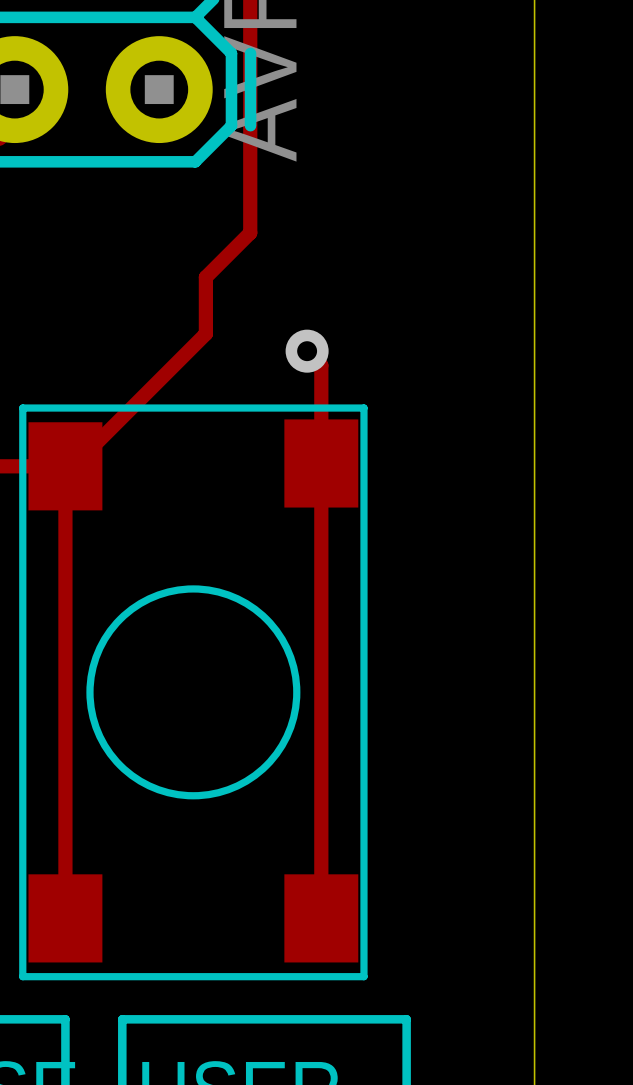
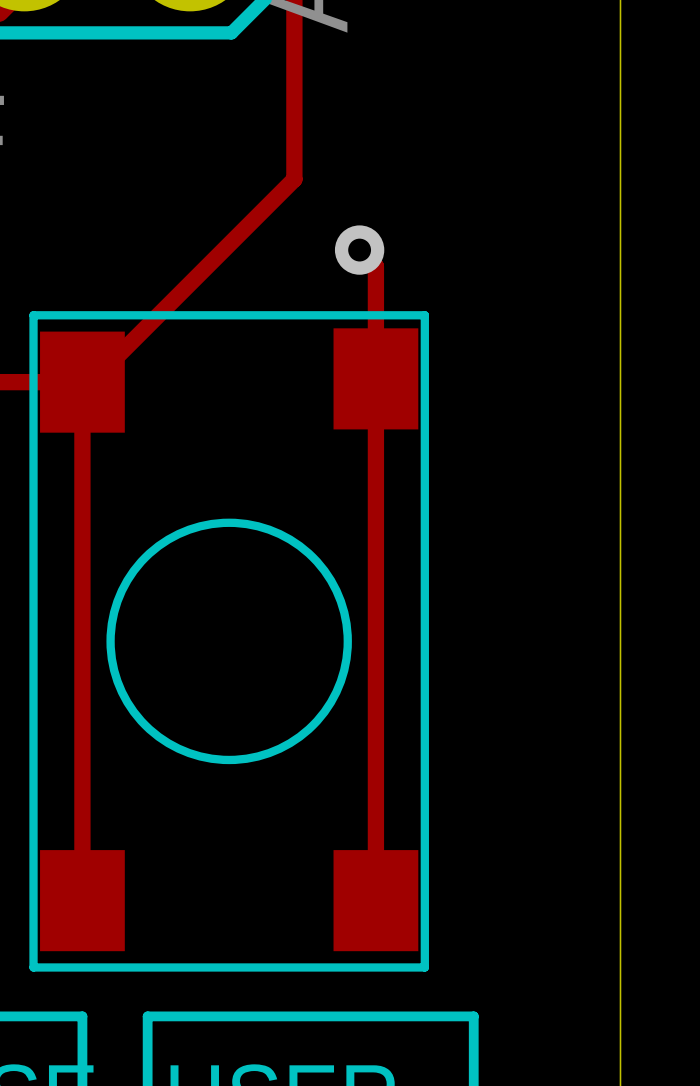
track: (250, 232) (205, 277) (205, 333) -> (294, 114) (294, 179) (243, 230)

